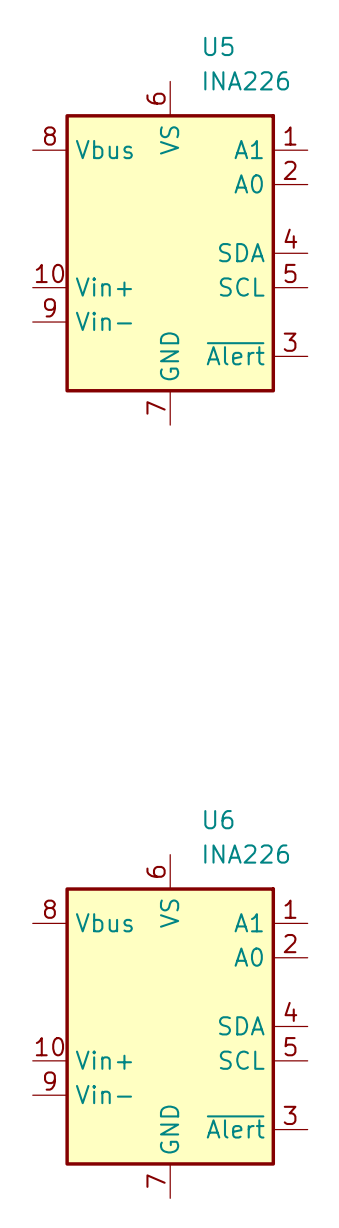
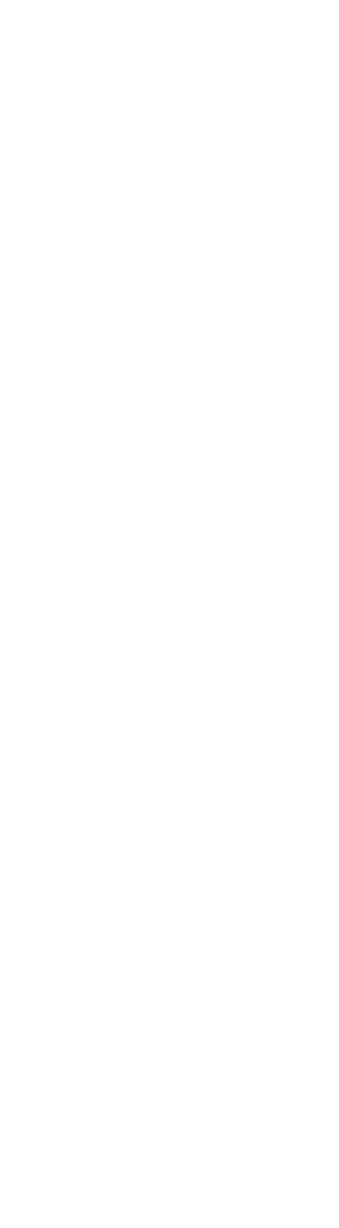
U5: INA226 (170, 253) -> none
U6: INA226 (170, 1026) -> none

